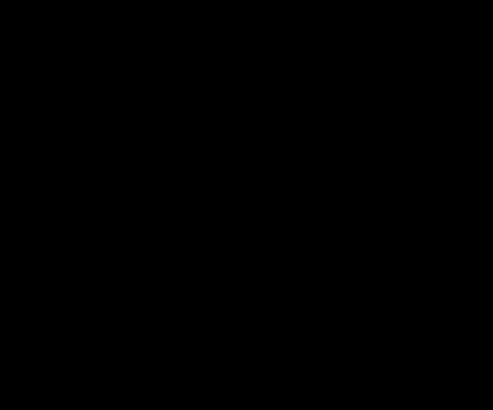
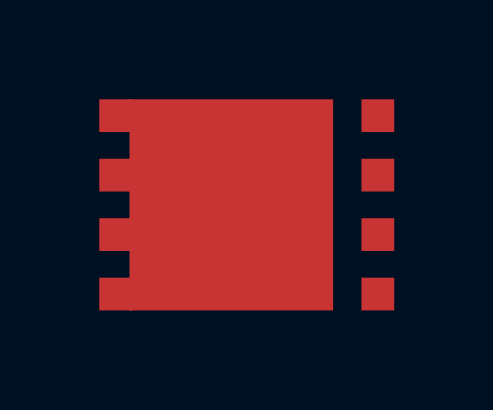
part: none -> (246, 204)

